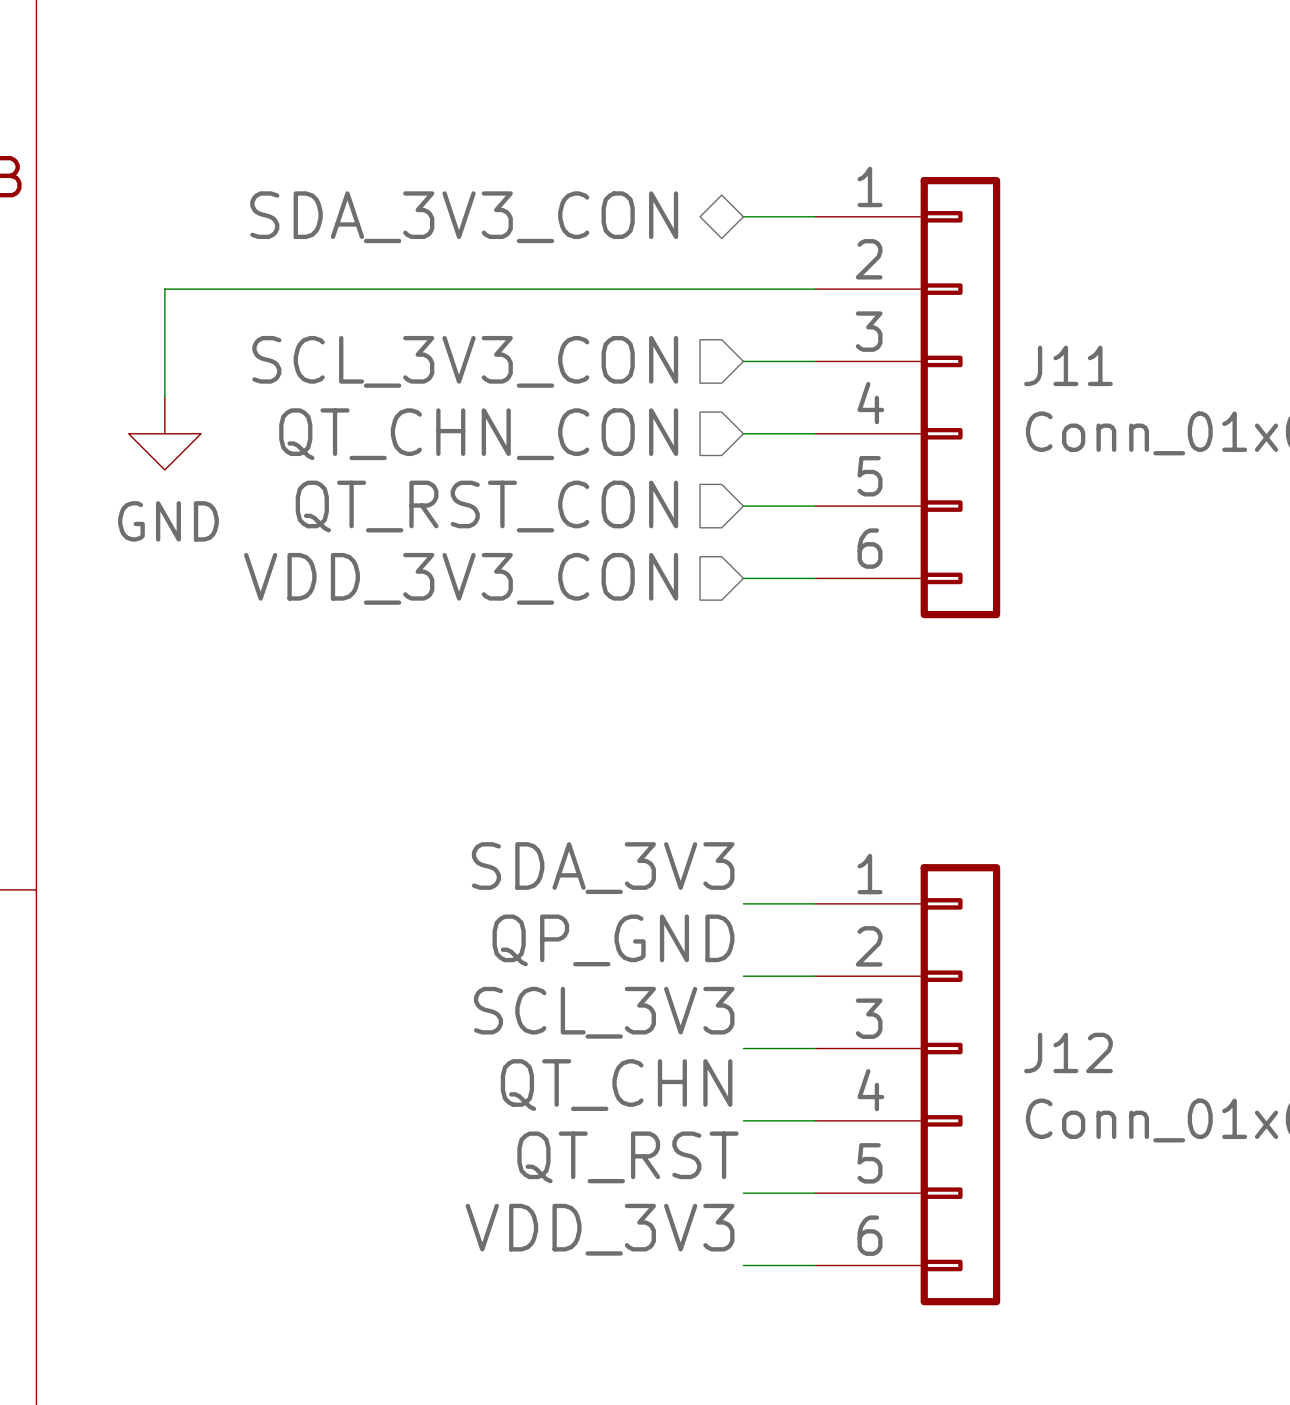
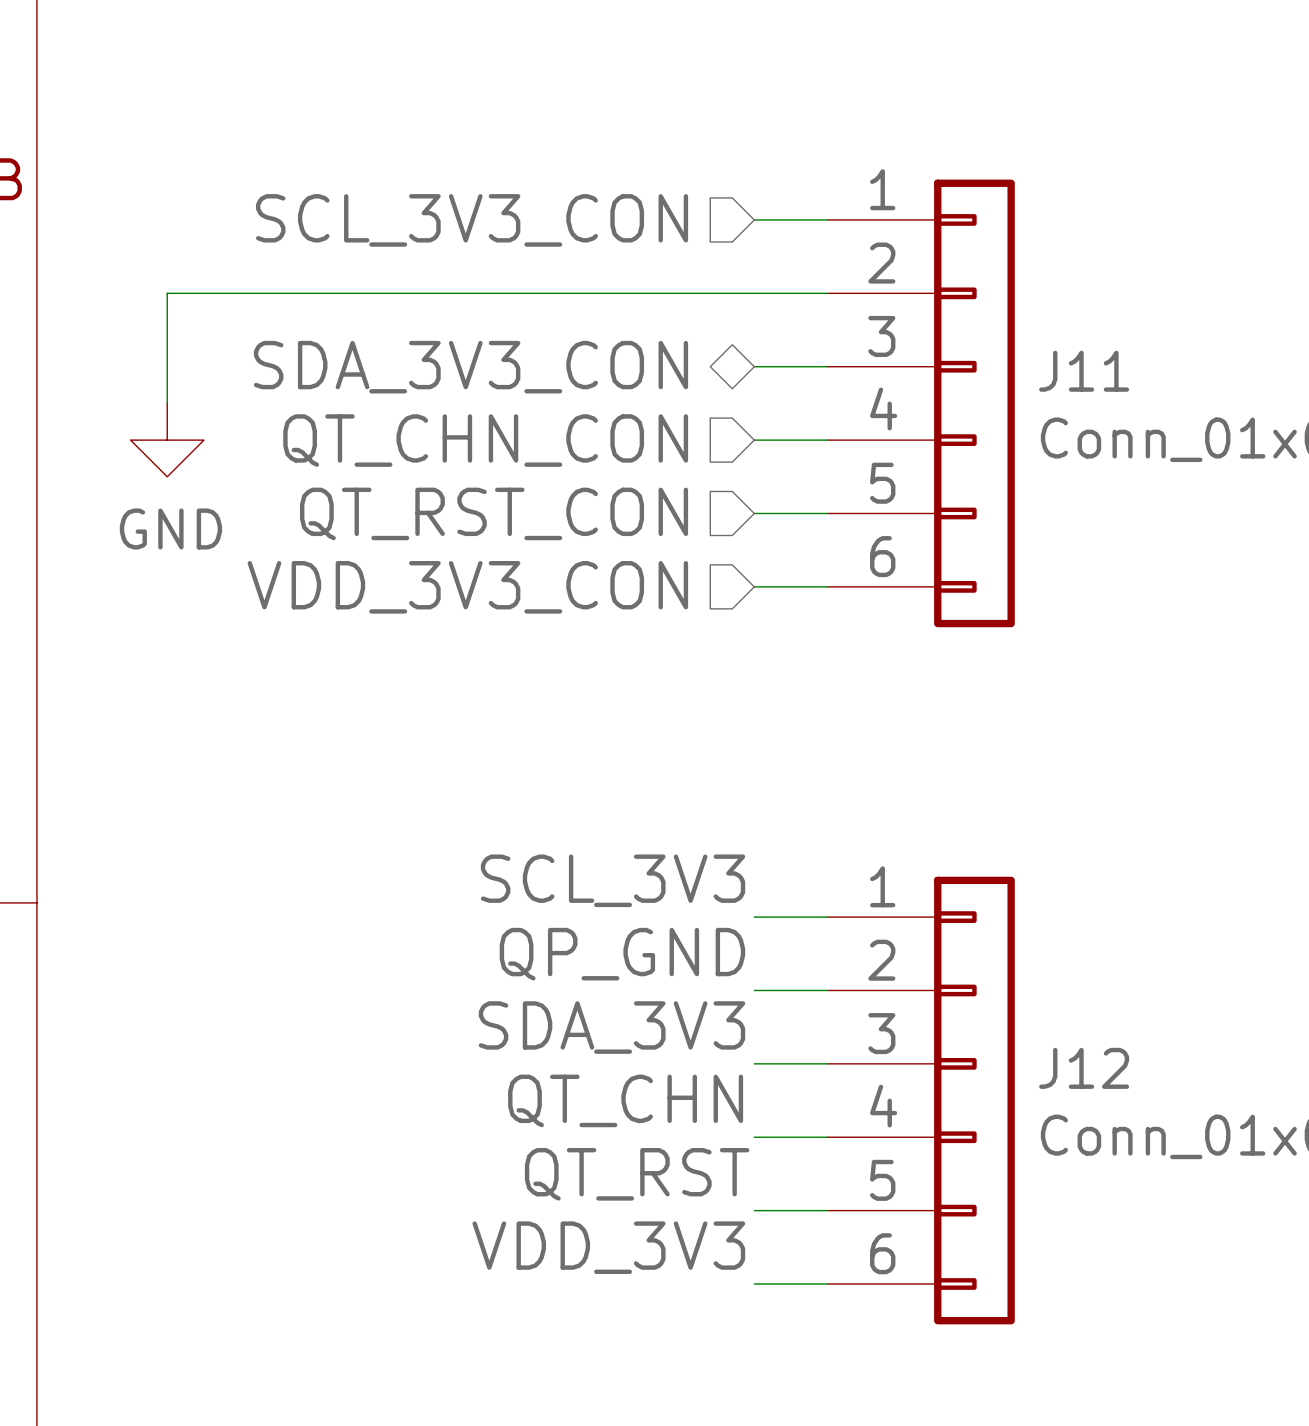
hierarchical label shape: bidirectional (464, 217) -> input (472, 220)
hierarchical label: SDA_3V3_CON (464, 217) -> SCL_3V3_CON (472, 220)
hierarchical label shape: input (465, 361) -> bidirectional (470, 367)
hierarchical label: SCL_3V3_CON (465, 361) -> SDA_3V3_CON (470, 367)
label: SDA_3V3 (603, 868) -> SCL_3V3 (613, 880)
label: SCL_3V3 (604, 1012) -> SDA_3V3 (611, 1027)

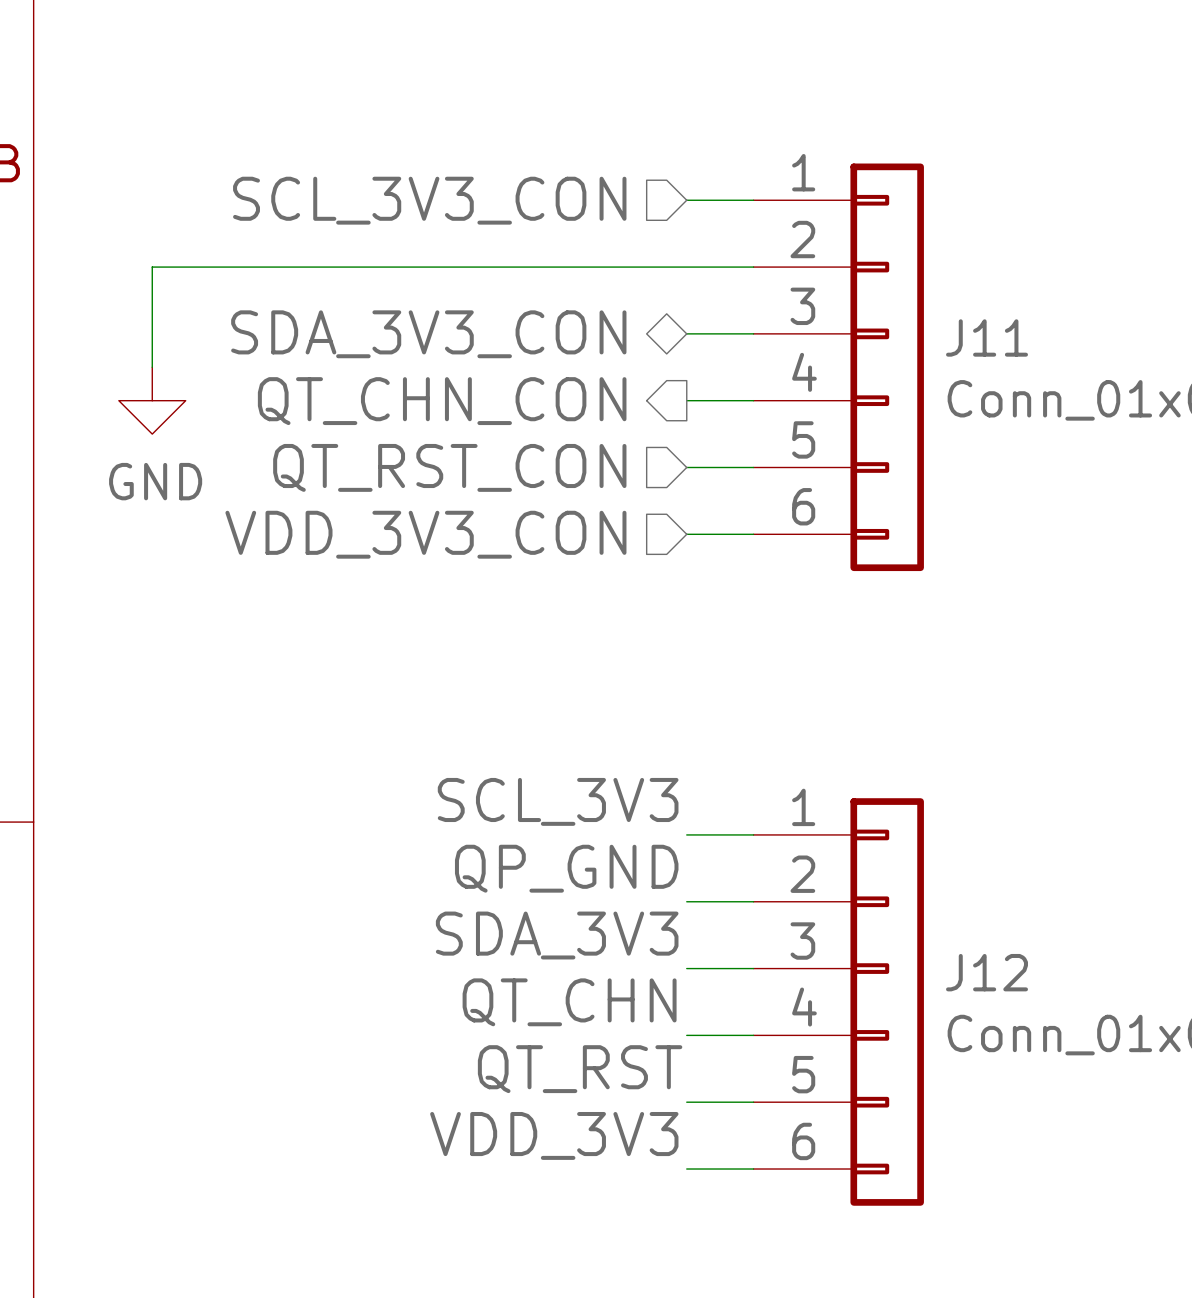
hierarchical label shape: input (485, 440) -> output (442, 401)

